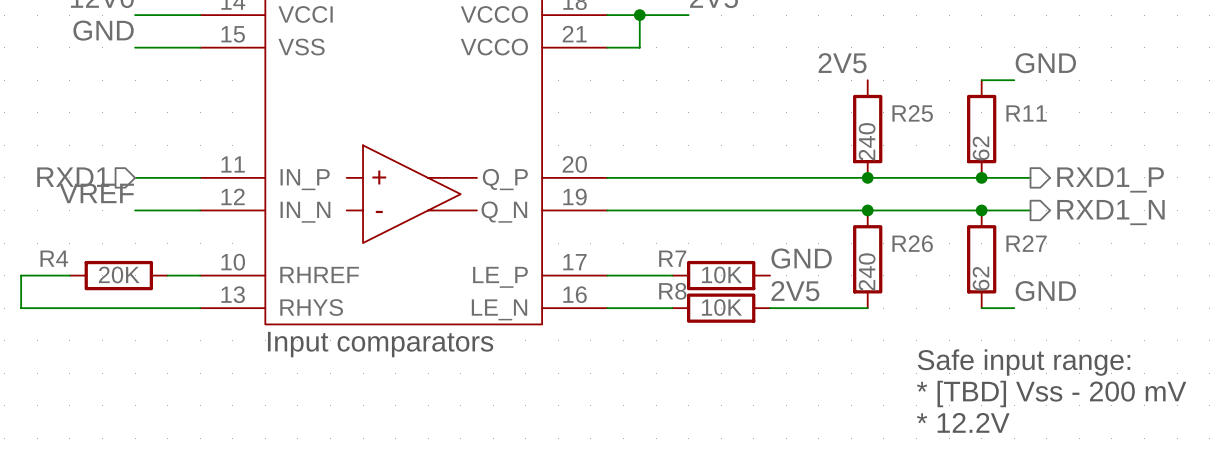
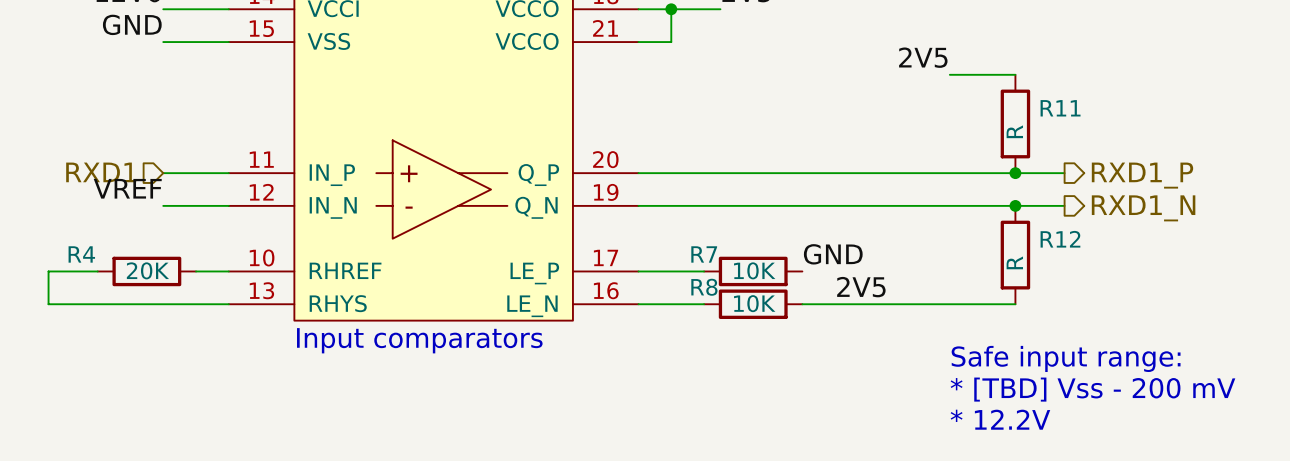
label position: 2V5 (842, 63) -> 2V5 (923, 57)
label: GND (1045, 63) -> none
wire: (981, 80) (1014, 80) -> (1015, 74) (949, 74)
R25: 240 (867, 129) -> none
R11 value: 62 (981, 148) -> R (1014, 131)
junction: (867, 177) -> none
junction: (867, 210) -> none
R27 name: R27 (1026, 243) -> R12 (1060, 239)
R26: 240 (867, 259) -> none
R27 value: 62 (981, 278) -> R (1014, 262)
label position: 2V5 (795, 291) -> 2V5 (861, 287)
label: GND (1045, 291) -> none
wire: (981, 308) (1014, 308) -> (1015, 304) (900, 304)

